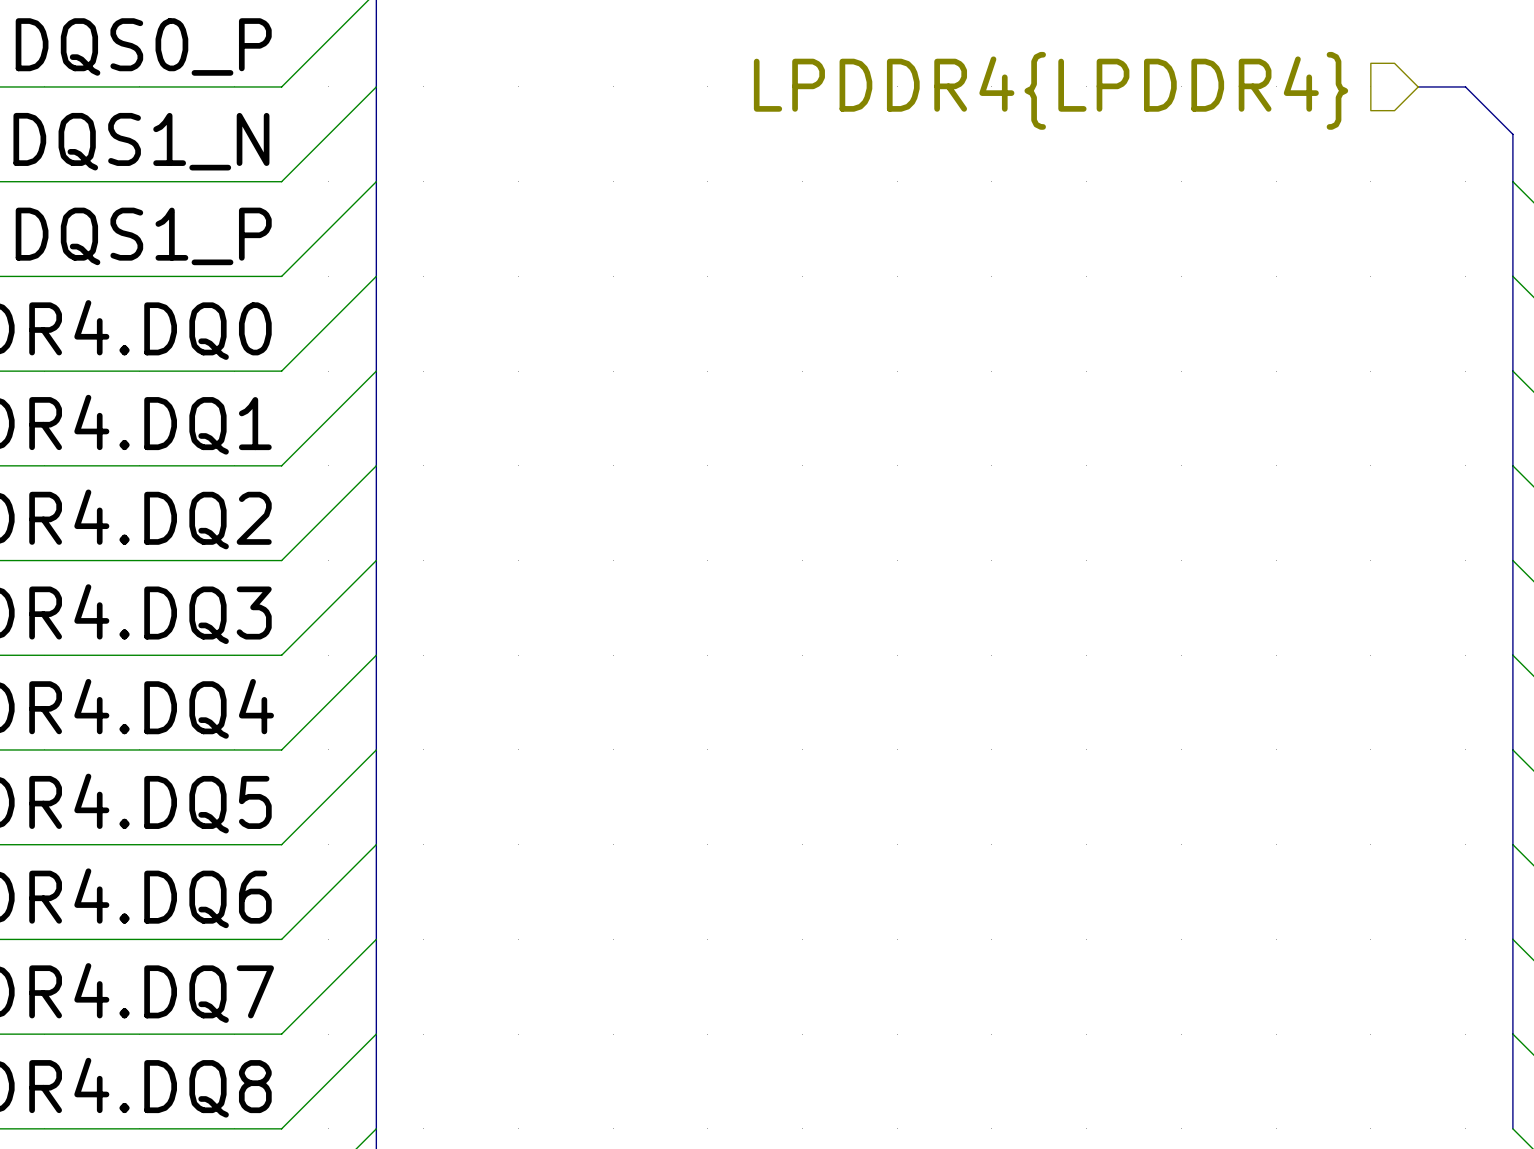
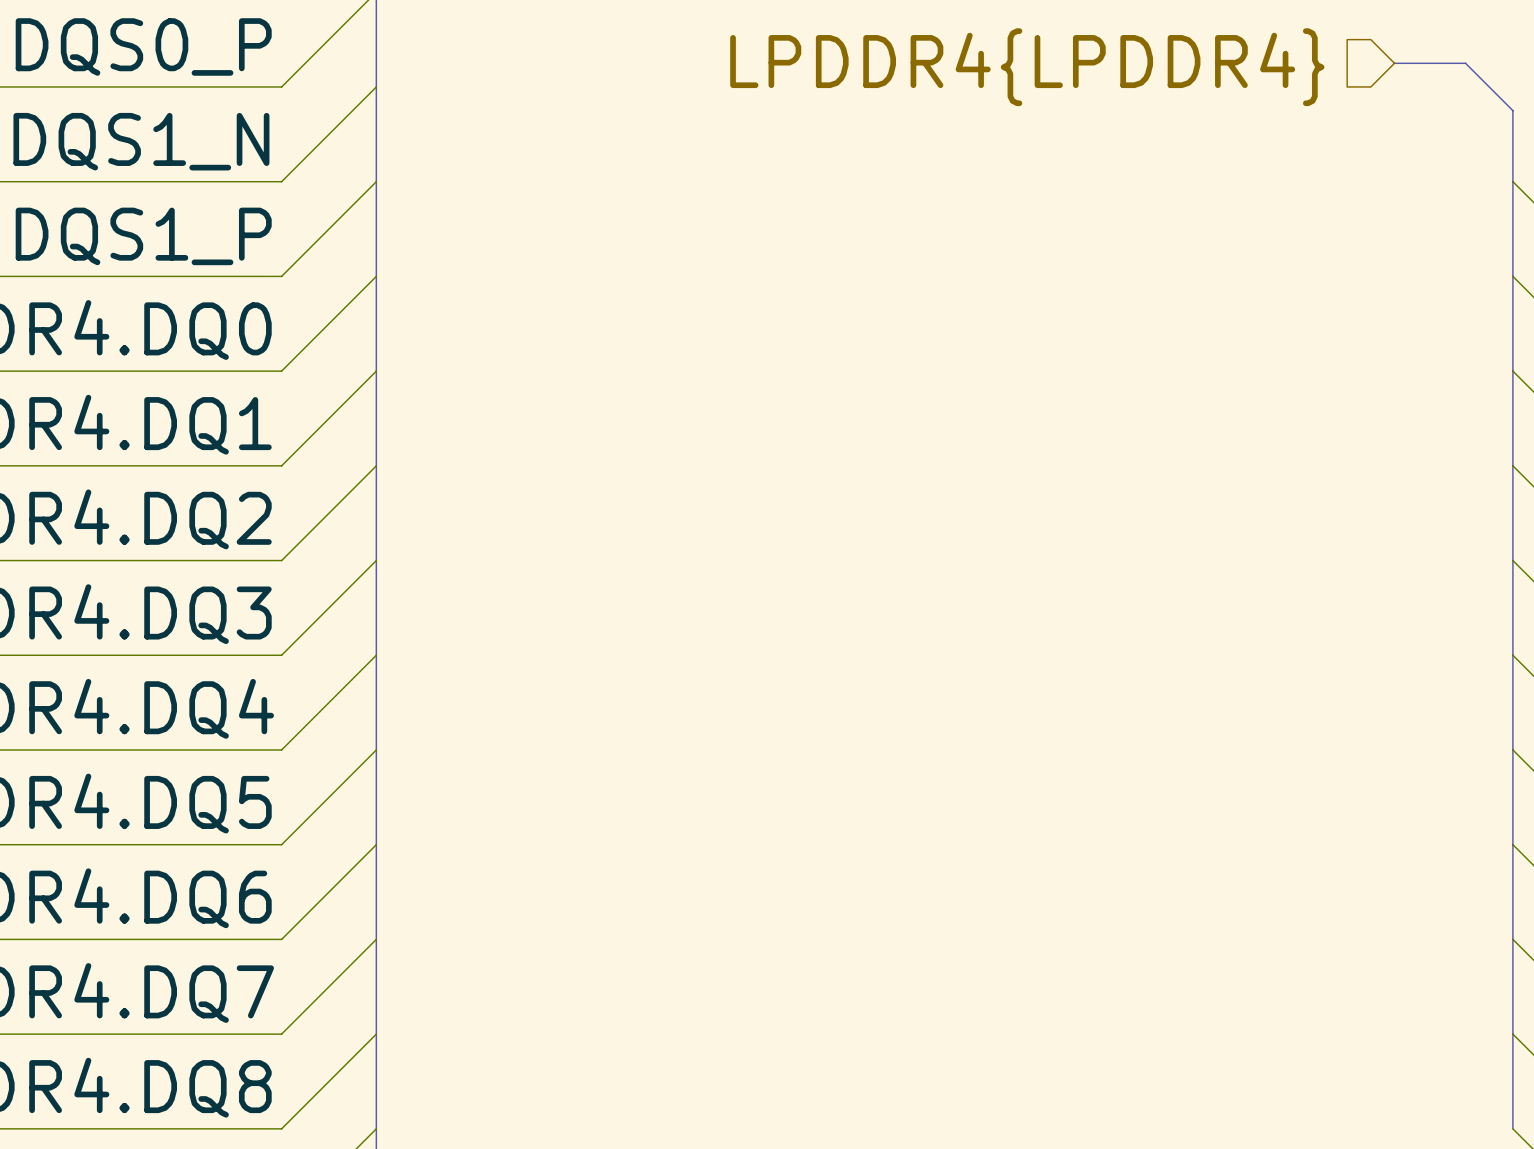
bus: (1418, 86) (1465, 86) (1512, 134) -> (1394, 63) (1465, 63) (1512, 110) (1512, 134)
hierarchical label position: LPDDR4{LPDDR4} (1051, 90) -> LPDDR4{LPDDR4} (1027, 67)

